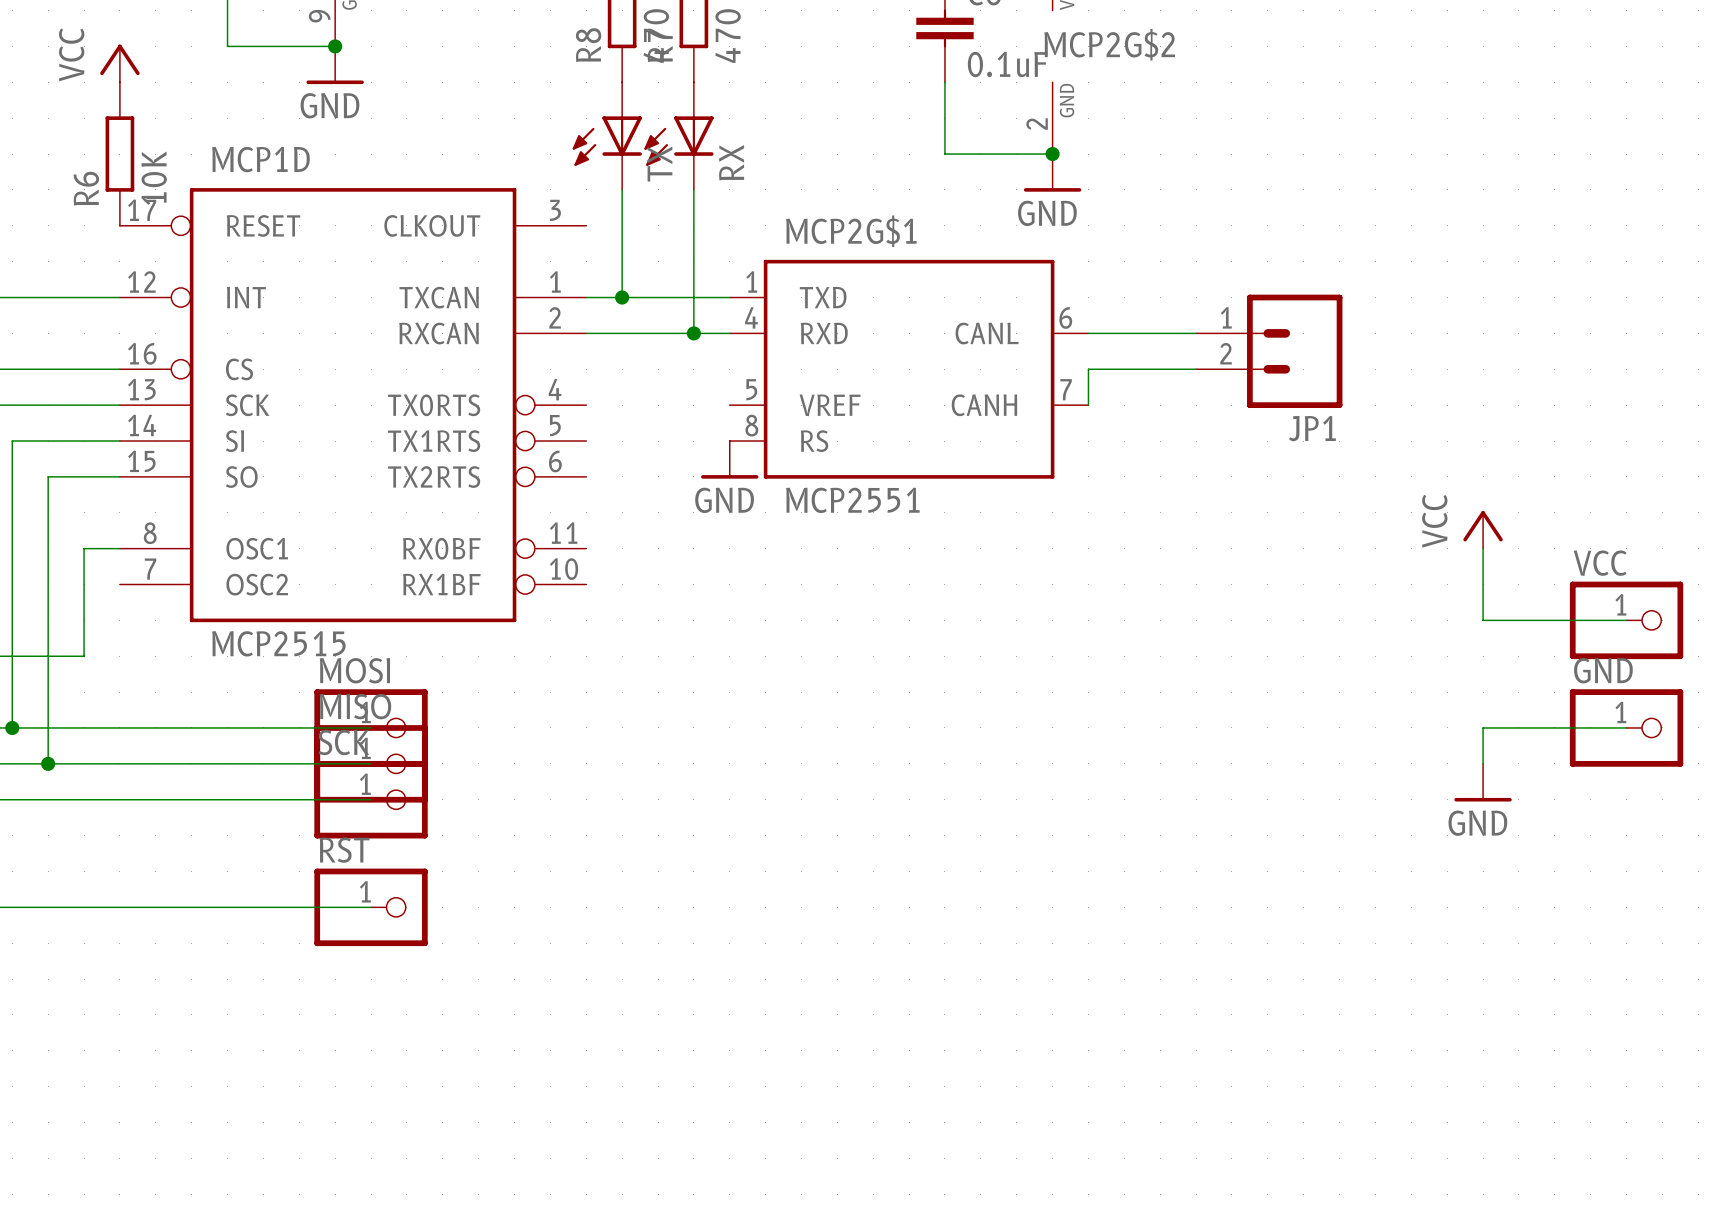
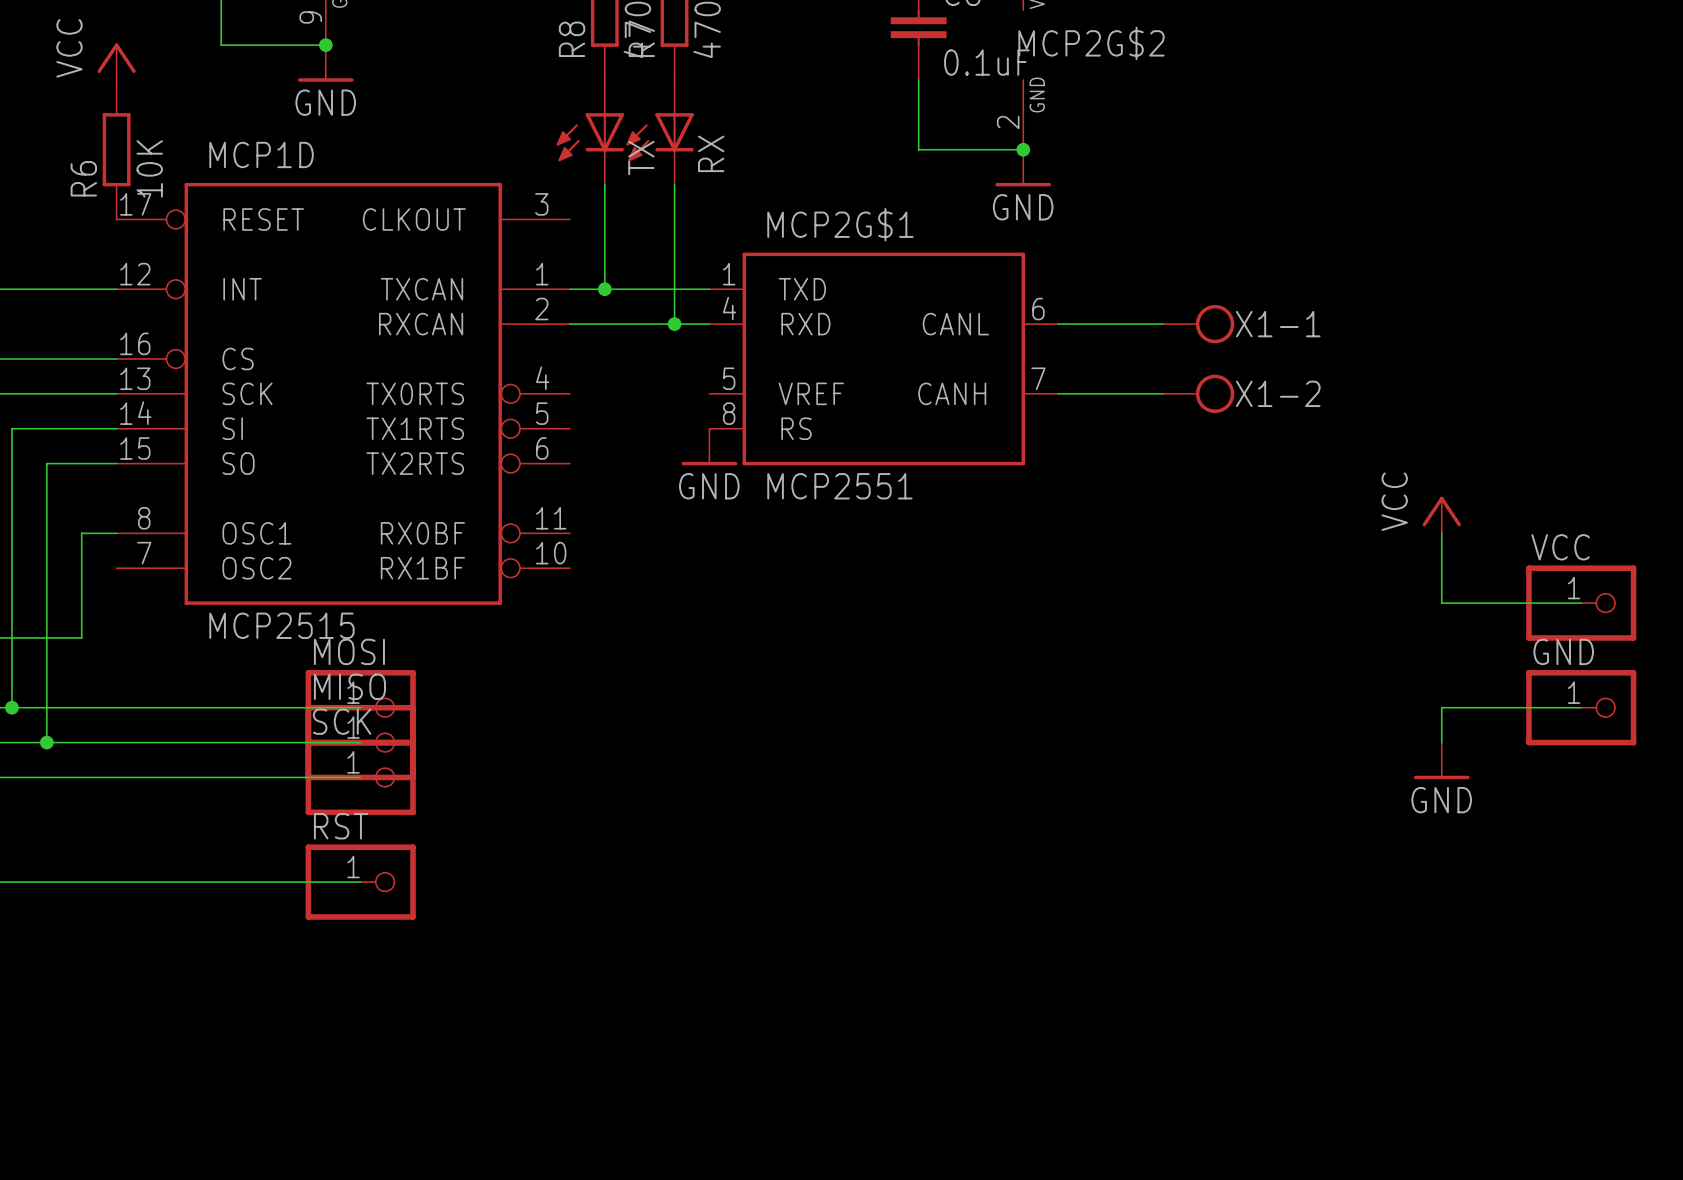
X1-1: none -> (1198, 324)
JP1: (1269, 351) -> none
wire: (1196, 369) (1088, 369) (1088, 405) -> (1162, 393) (1058, 393)
X1-2: none -> (1198, 393)

